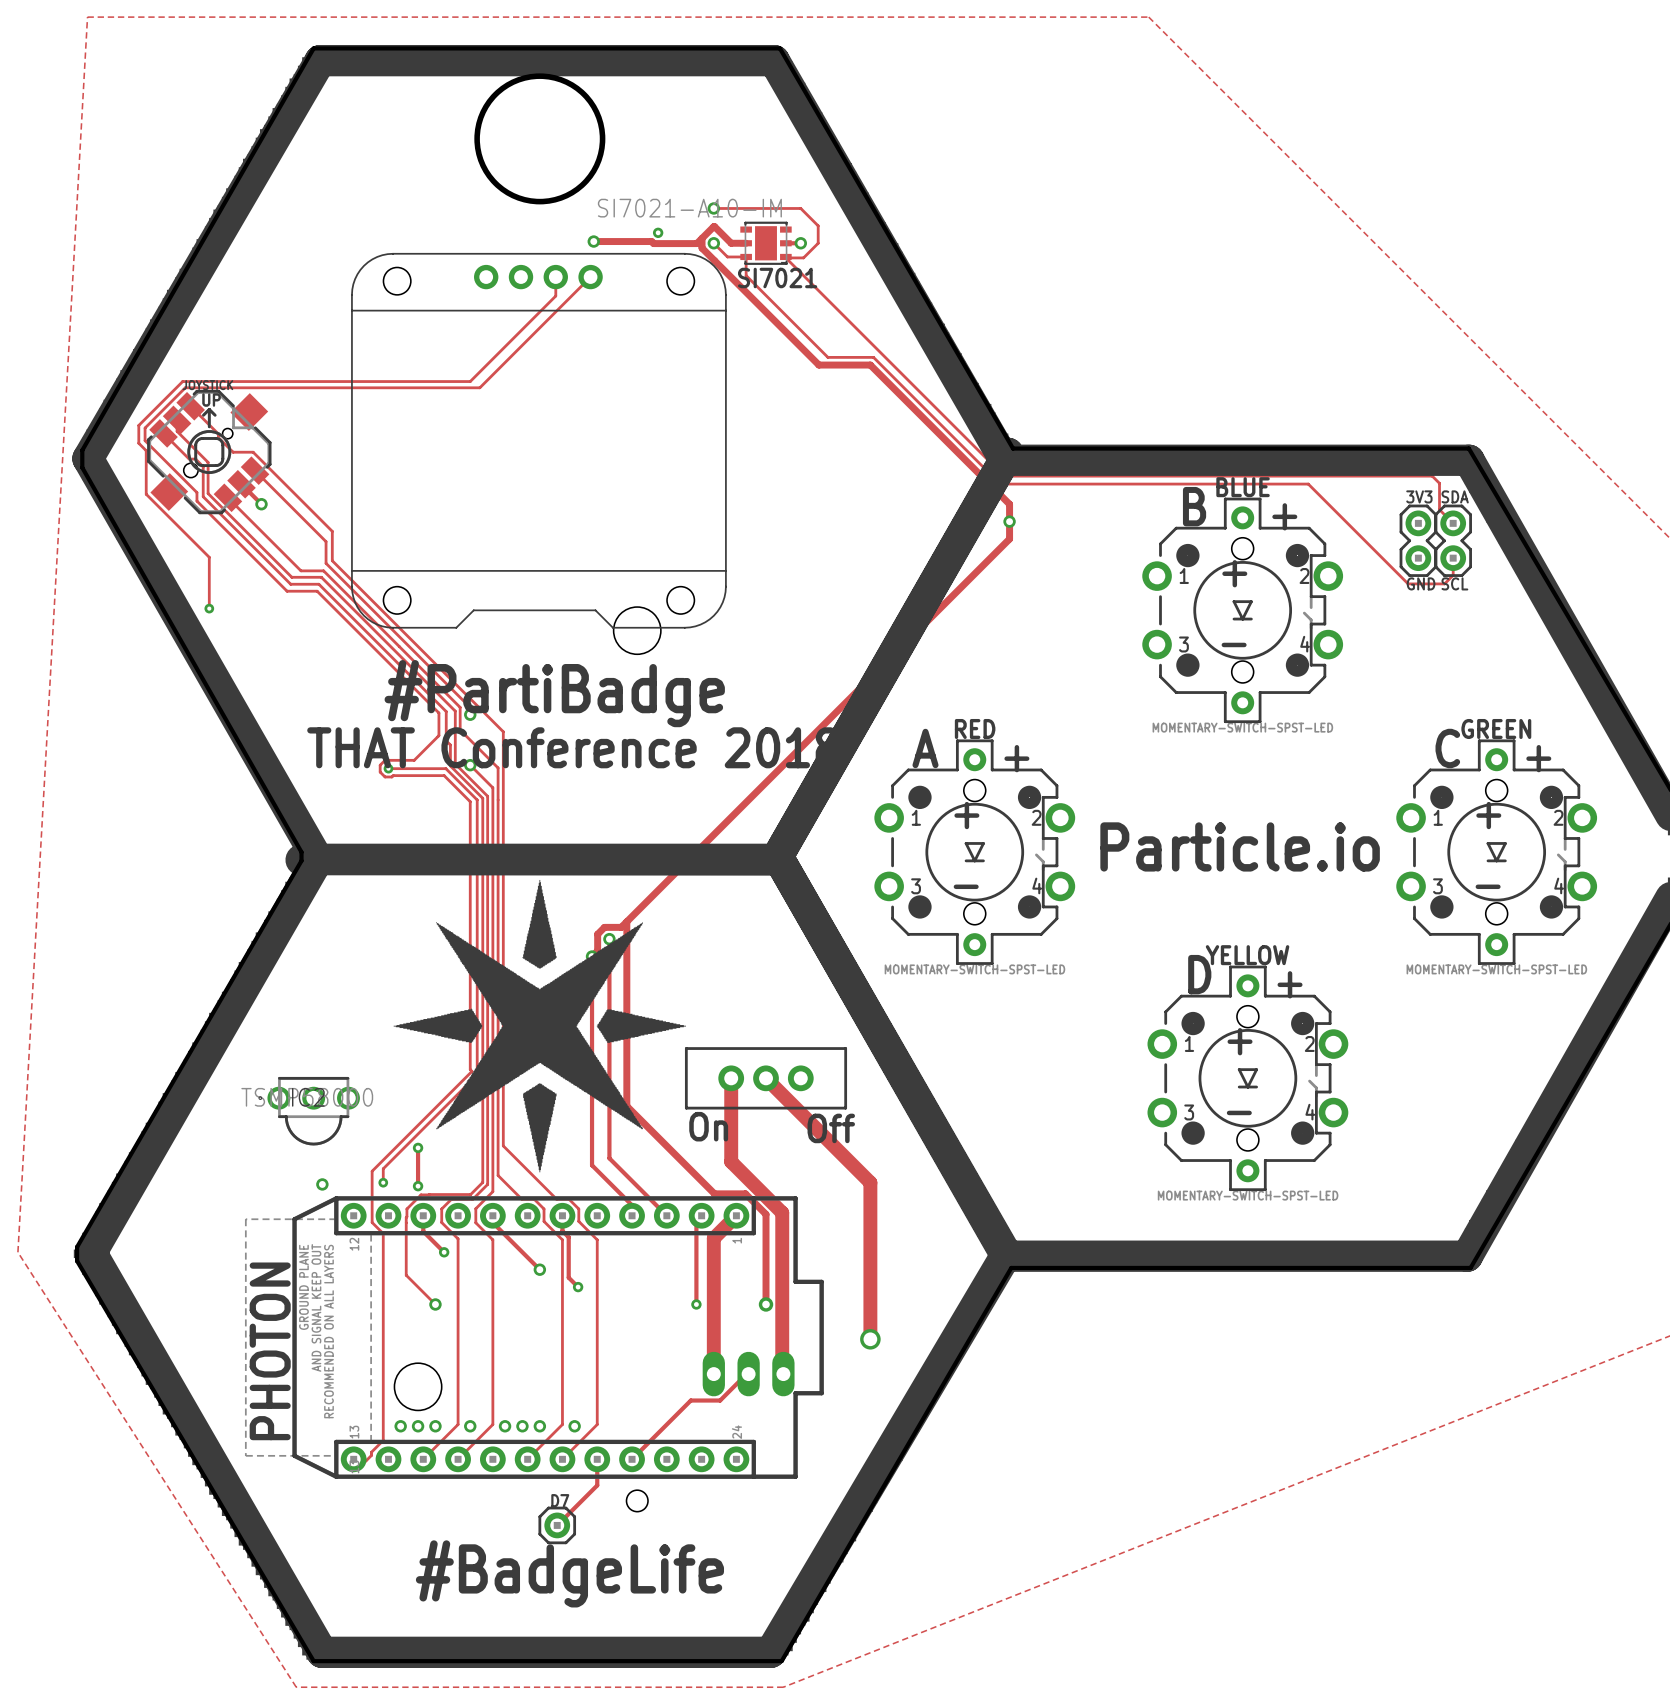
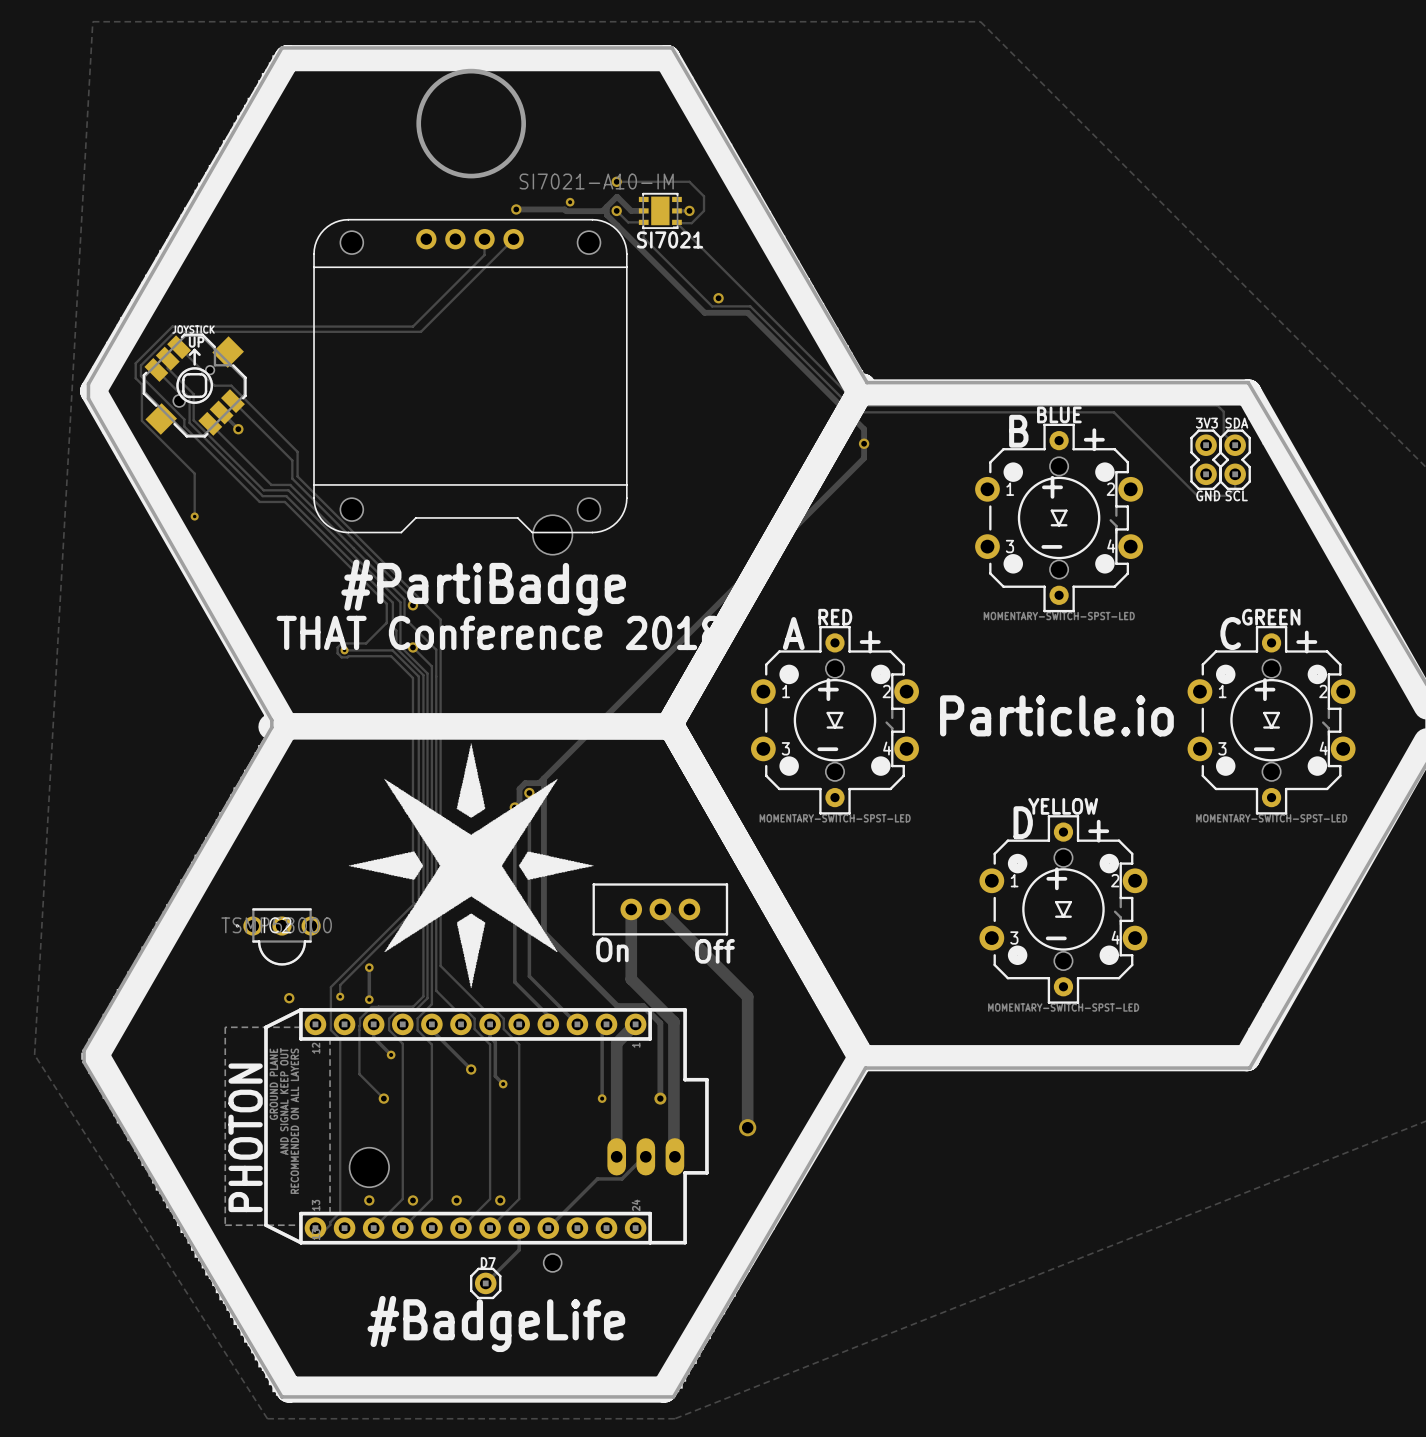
via: none -> (718, 298)
via: (400, 1426) -> none
via: (435, 1426) -> none
via: (505, 1426) -> none
via: (539, 1426) -> none

